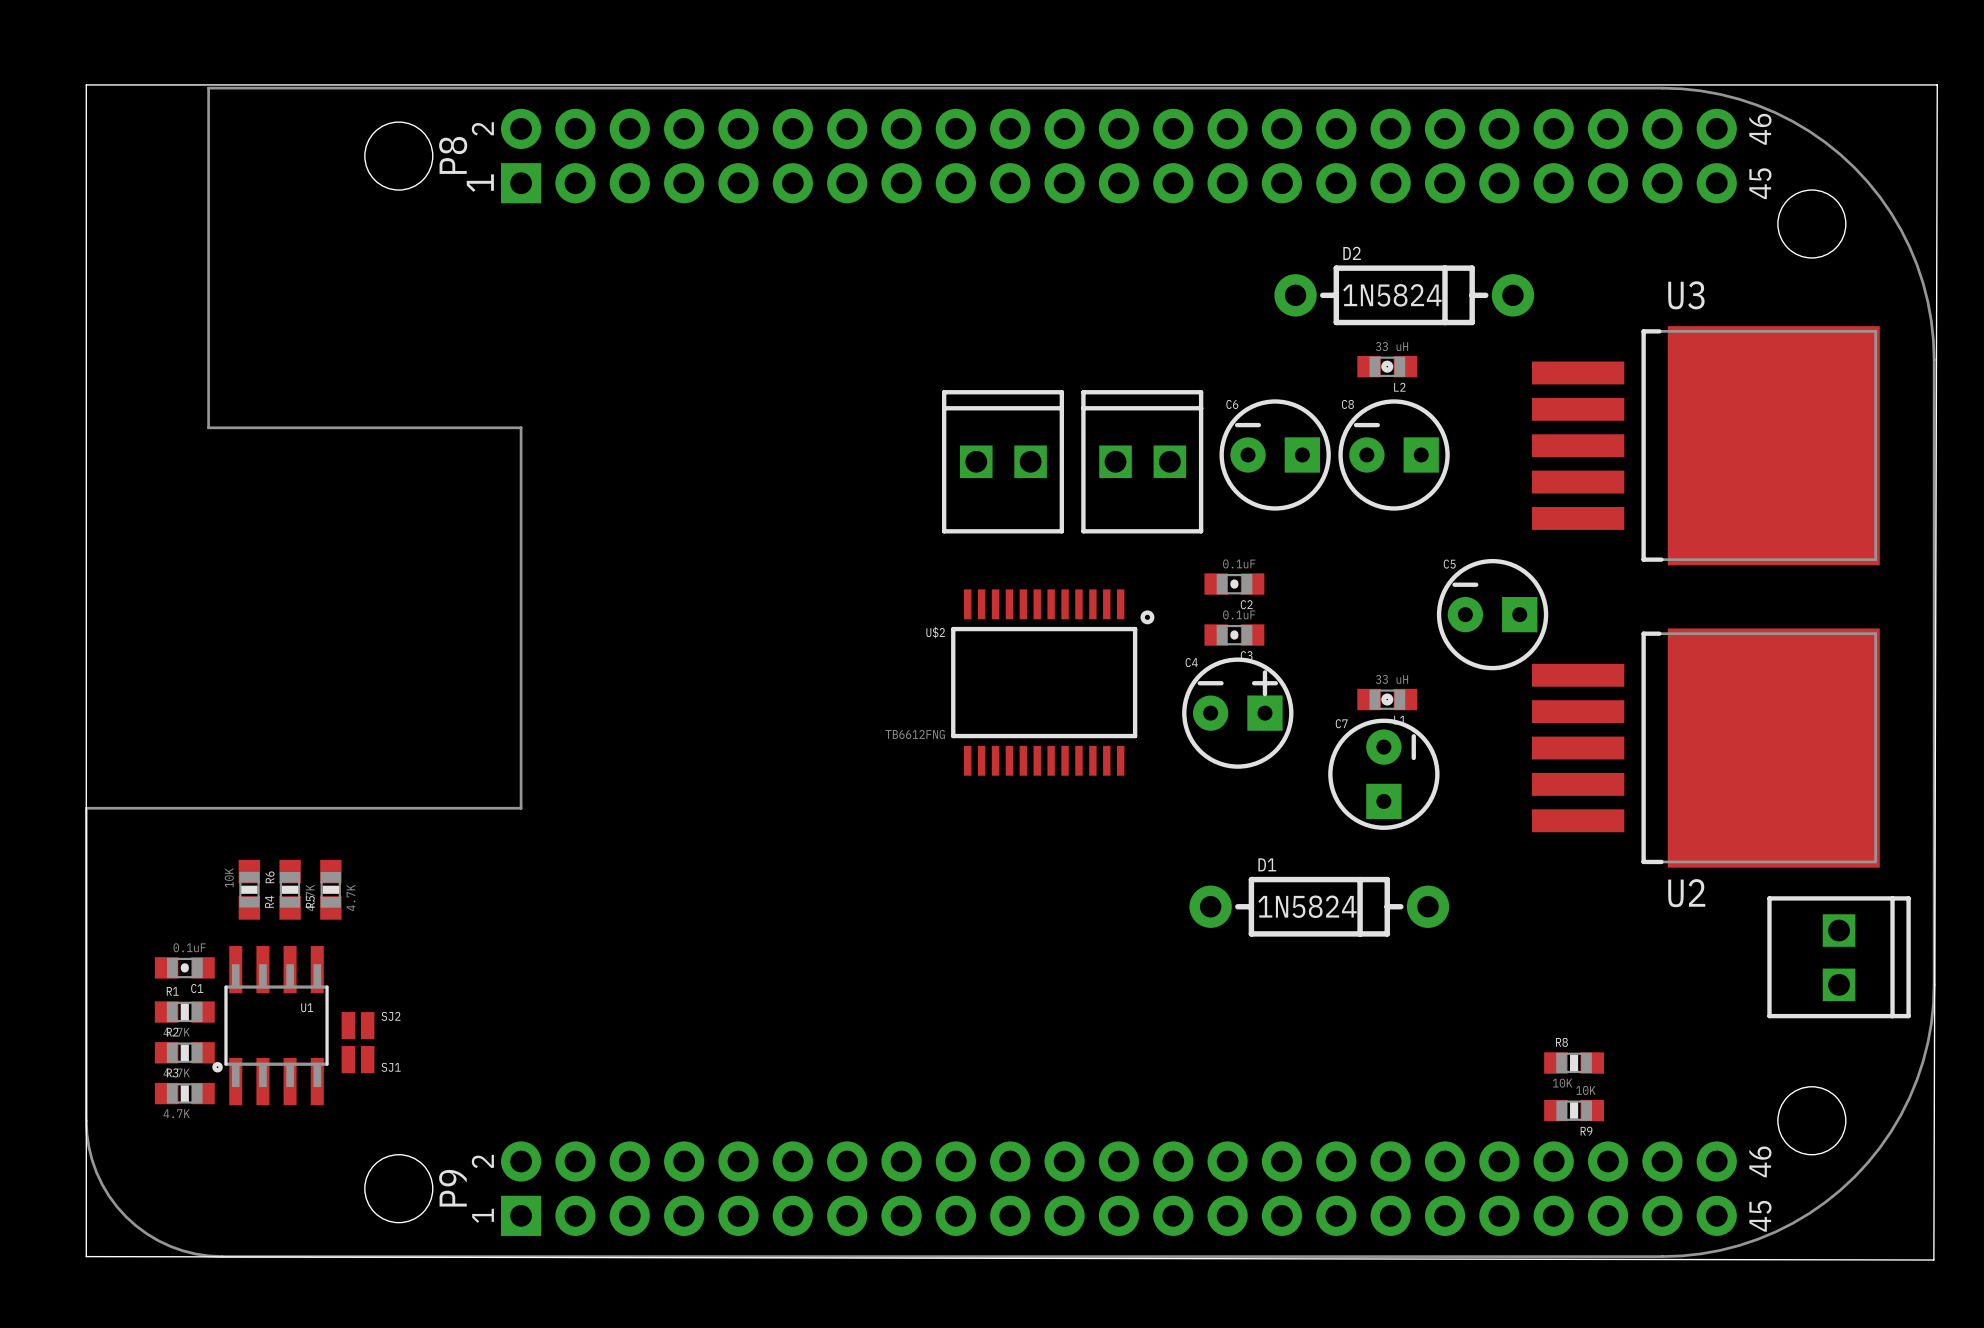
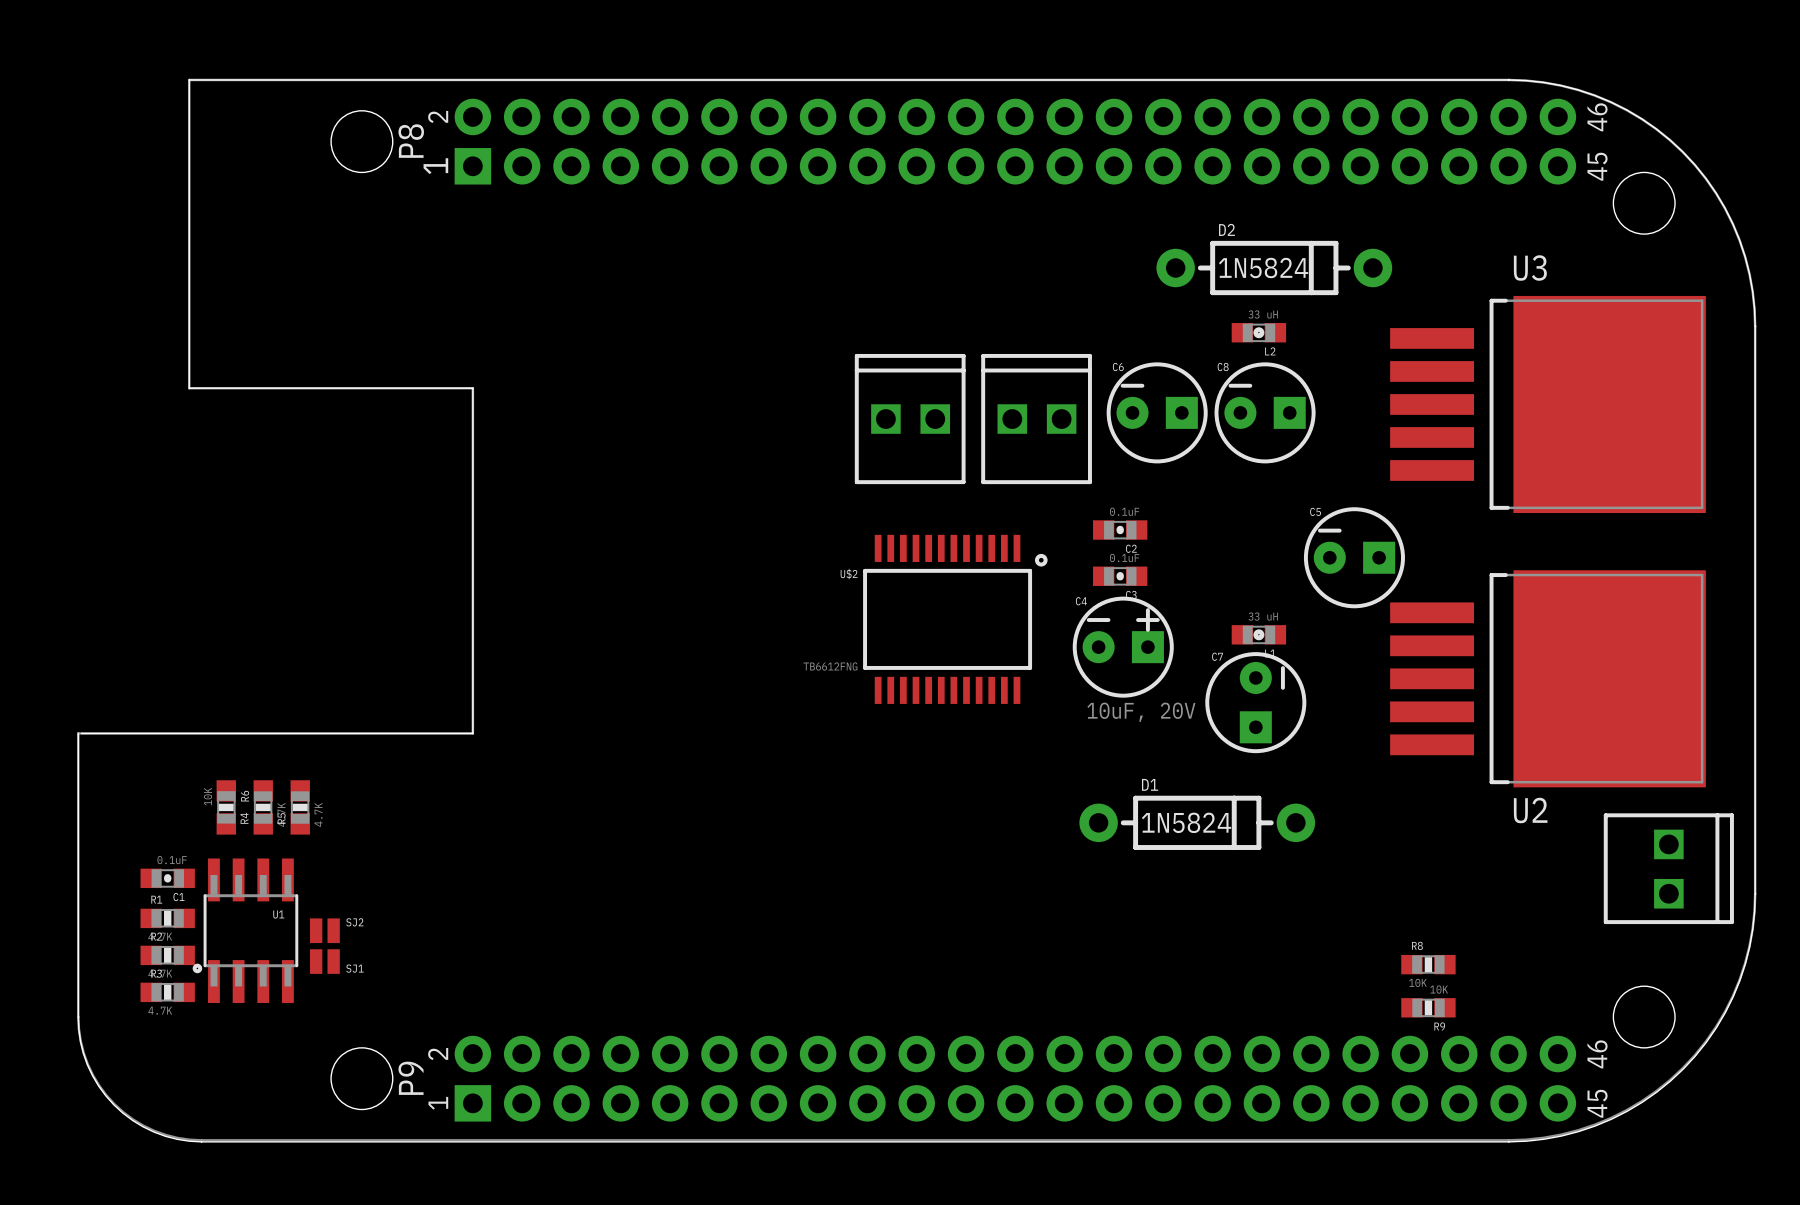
C4 value: none -> 10uF, 20V (1141, 712)
board edge: (86, 808) (86, 84) (1937, 84) (1933, 1260) (86, 1256) (86, 1120) -> (81, 733) (472, 733) (472, 388) (189, 388) (189, 79) (1508, 79) (1543, 82) (1578, 89) (1611, 102) (1642, 119) (1670, 140) (1695, 164) (1716, 193) (1732, 223) (1745, 256) (1752, 291) (1755, 326) (1755, 894) (1752, 929) (1745, 963) (1733, 996) (1706, 1042) (1683, 1068) (1656, 1092) (1611, 1119) (1561, 1136) (1508, 1141) (189, 1141) (154, 1132) (132, 1120) (114, 1105) (98, 1086) (87, 1064) (80, 1041) (78, 1017)

